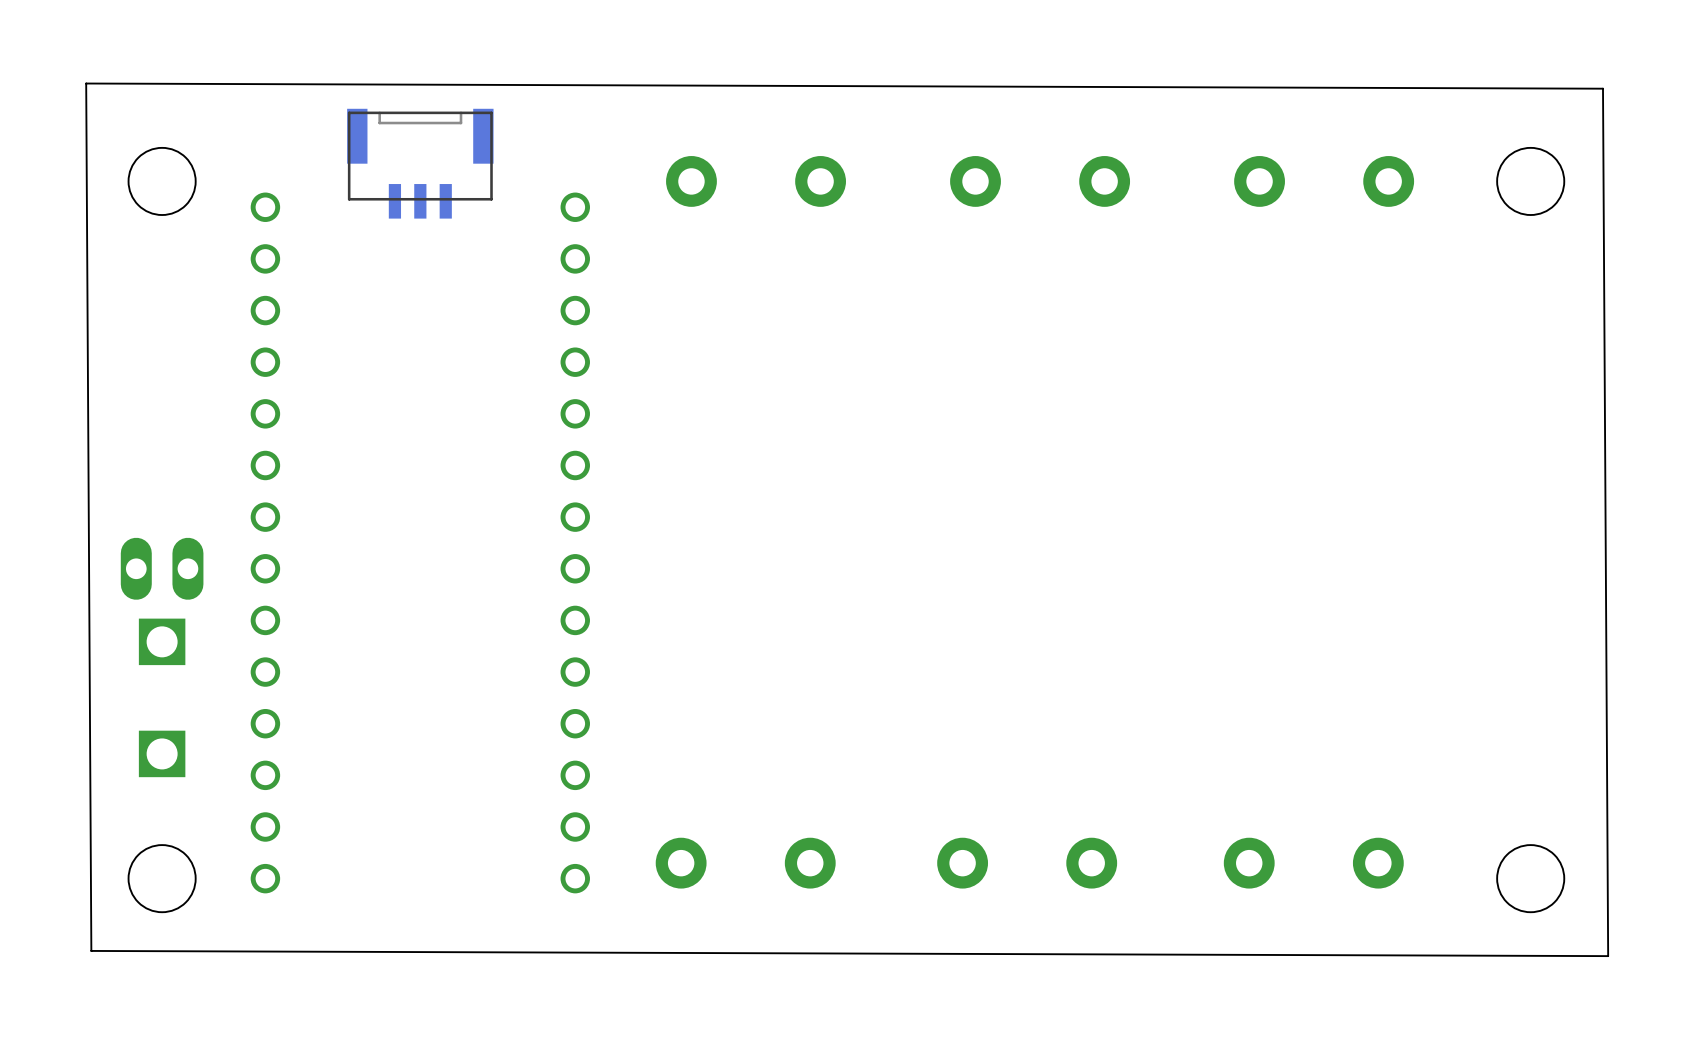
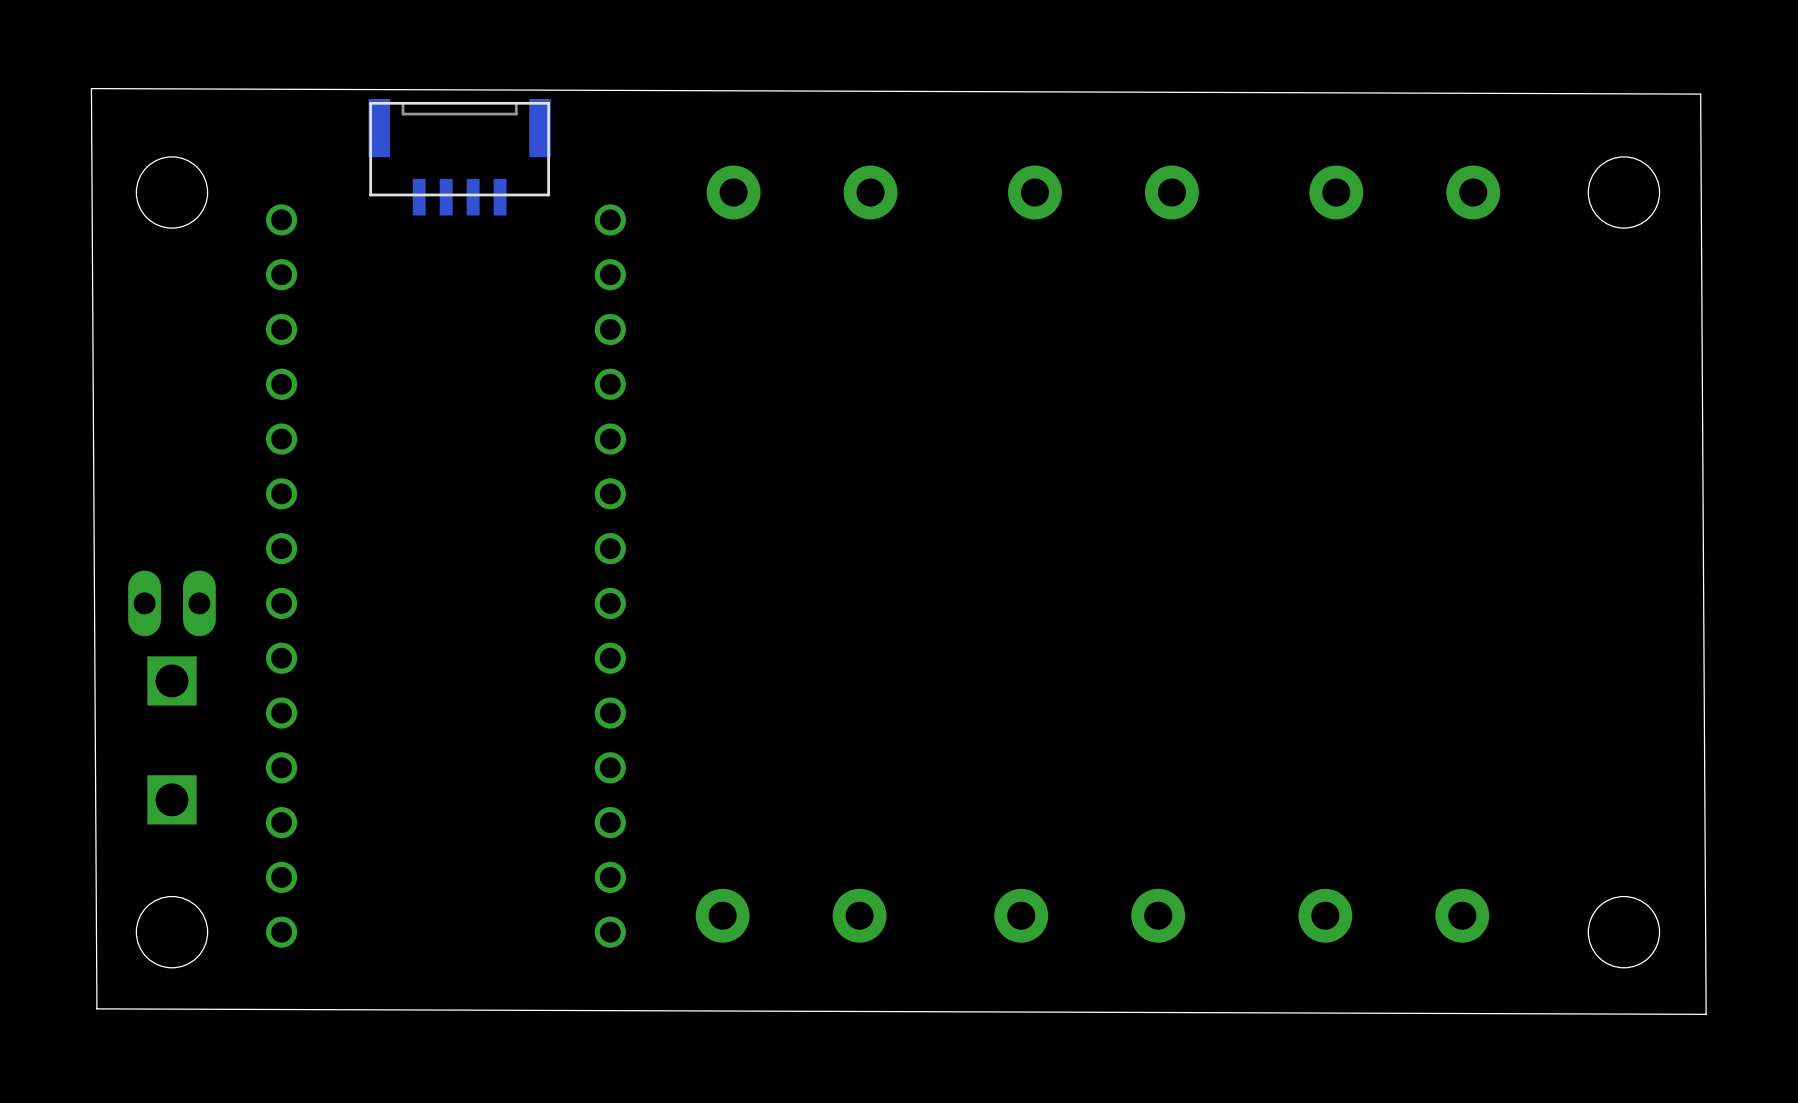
part footprint: [347, 108, 494, 219] -> [368, 98, 551, 216]

